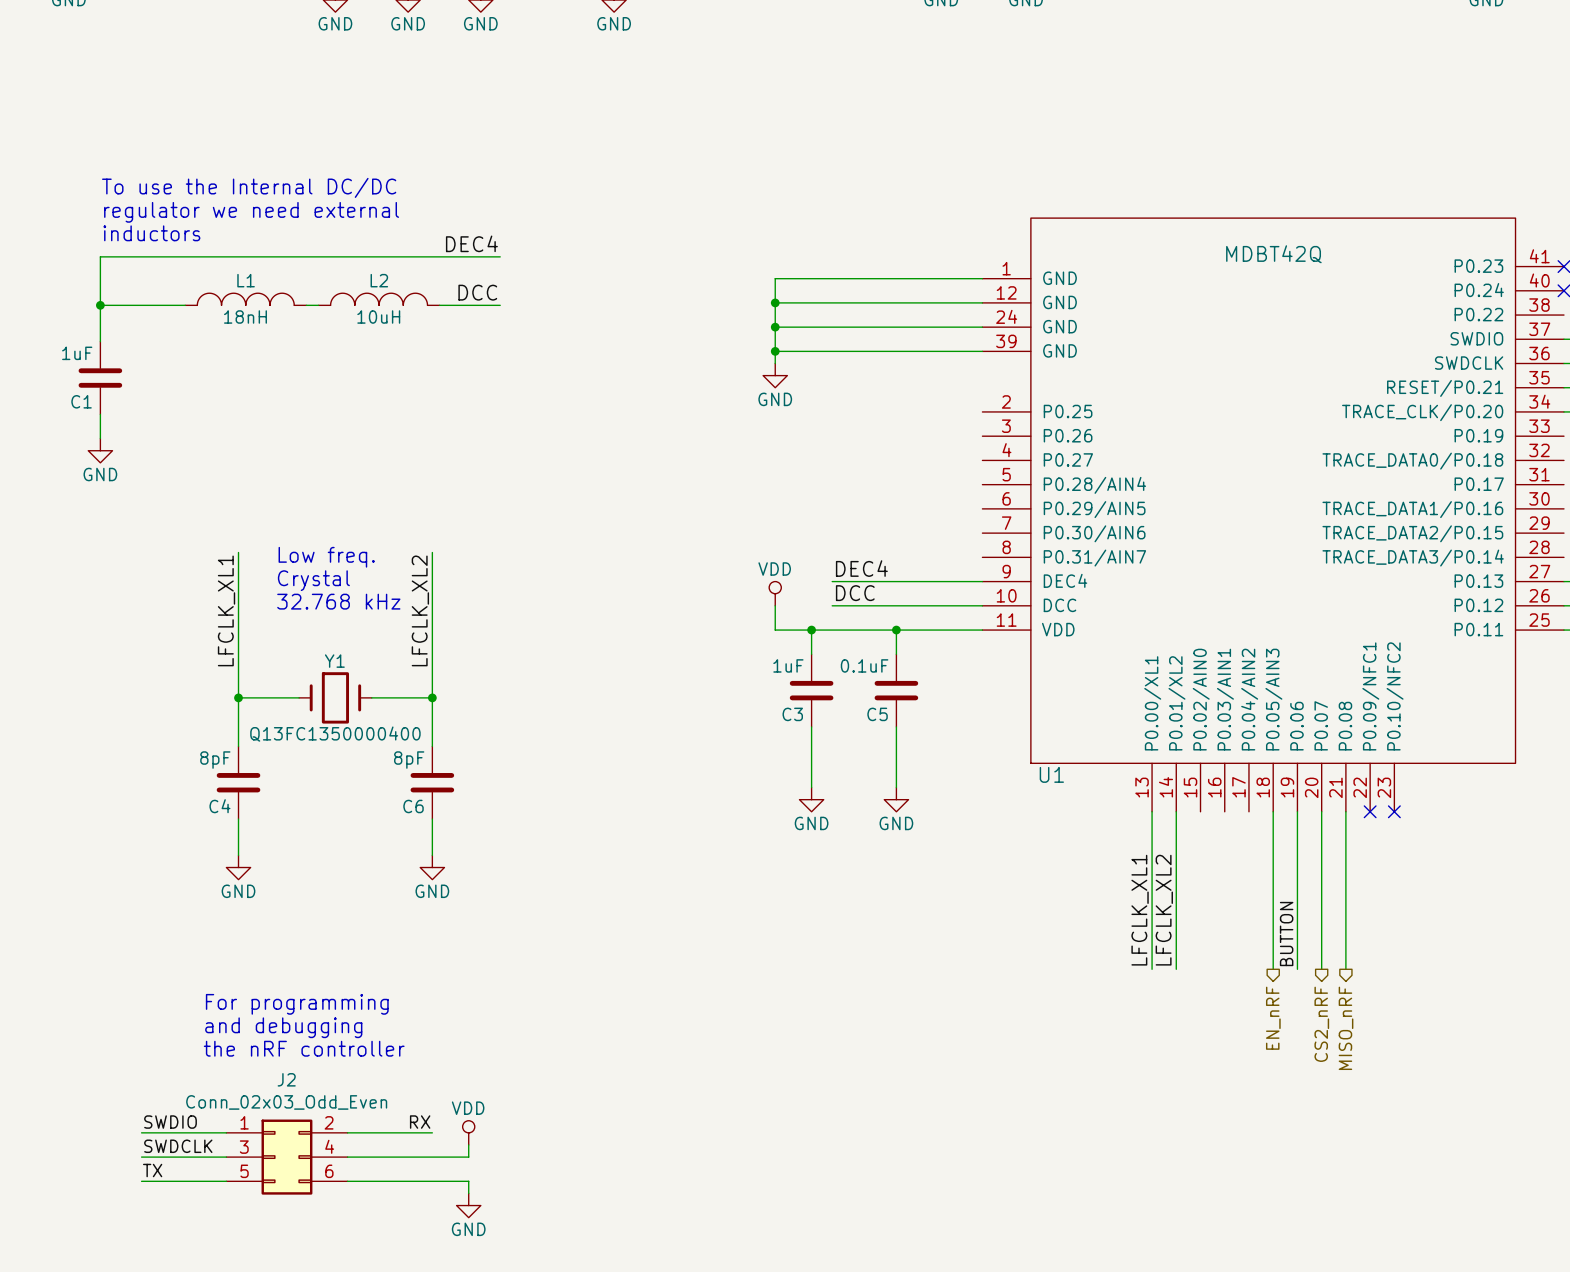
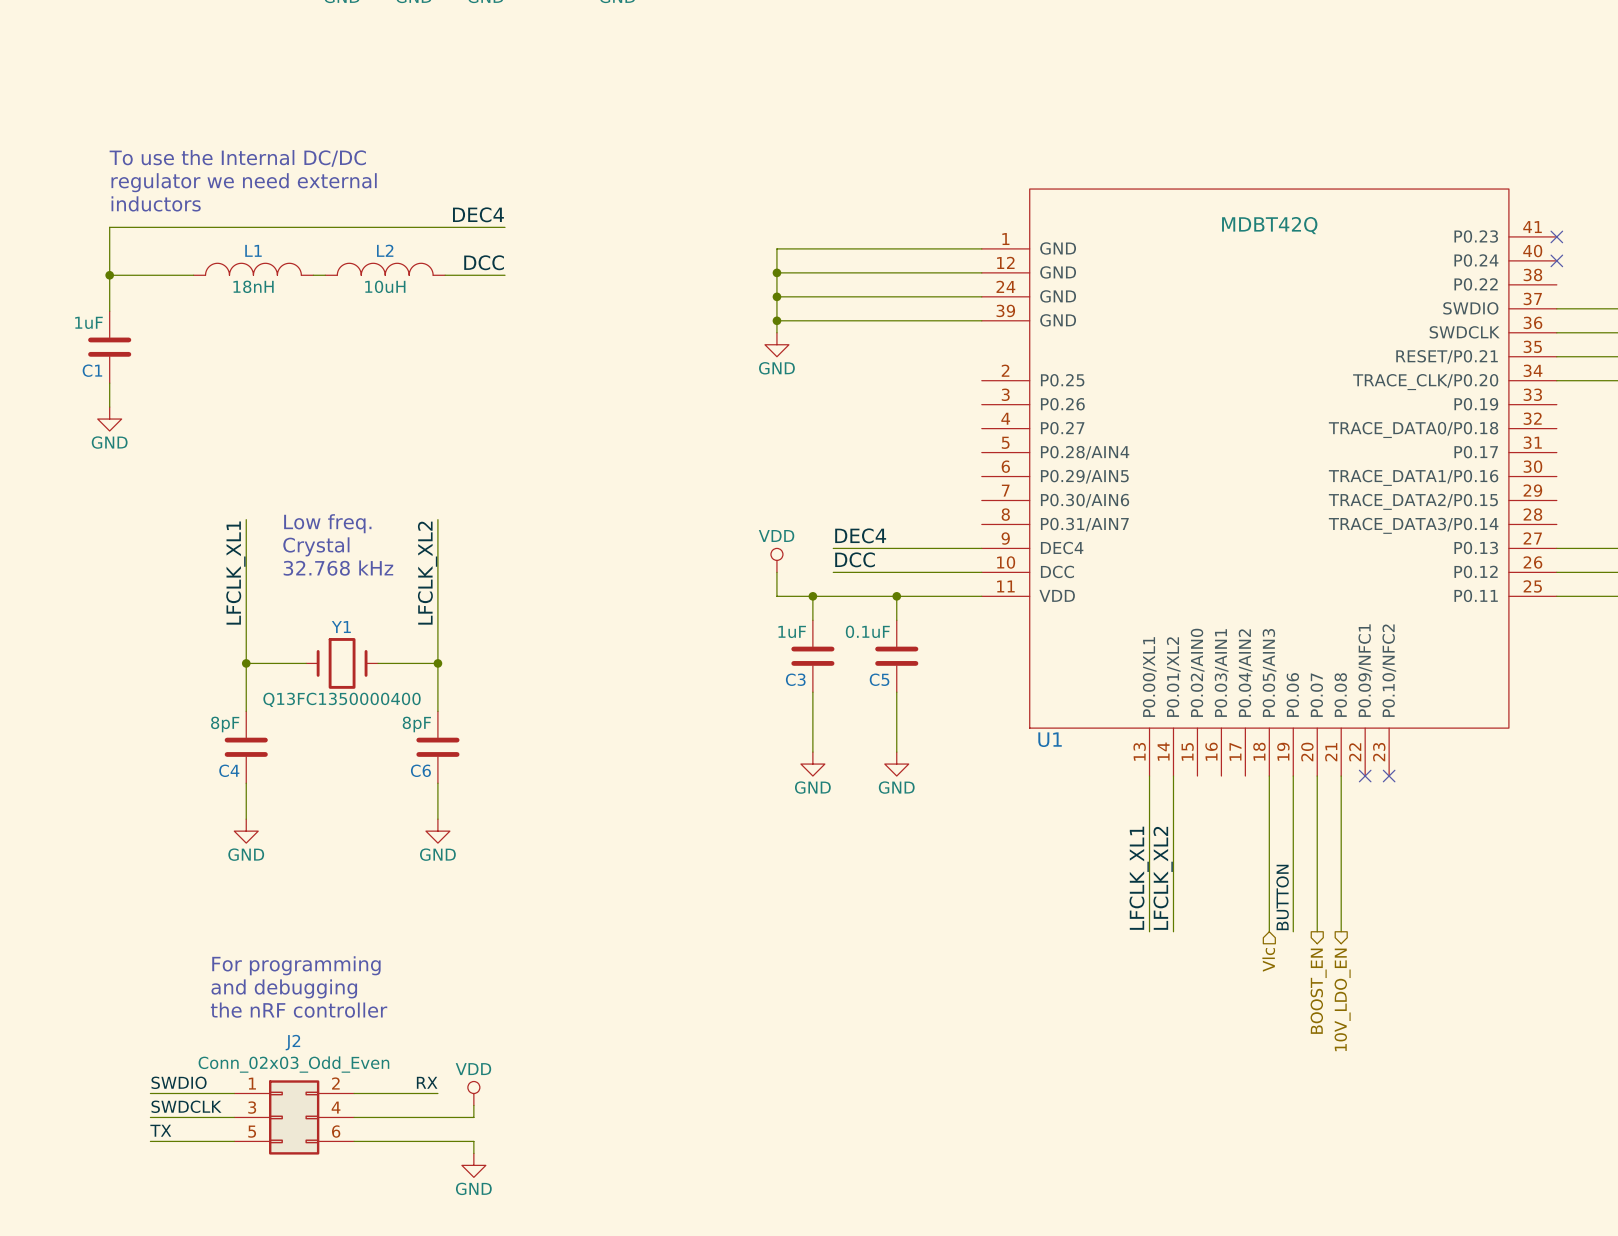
hierarchical label shape: output (1273, 1018) -> input (1268, 959)
hierarchical label: EN_nRF (1273, 1018) -> Vlc (1268, 959)
hierarchical label: CS2_nRF (1321, 1024) -> BOOST_EN (1318, 991)
hierarchical label: MISO_nRF (1346, 1028) -> 10V_LDO_EN (1342, 999)

